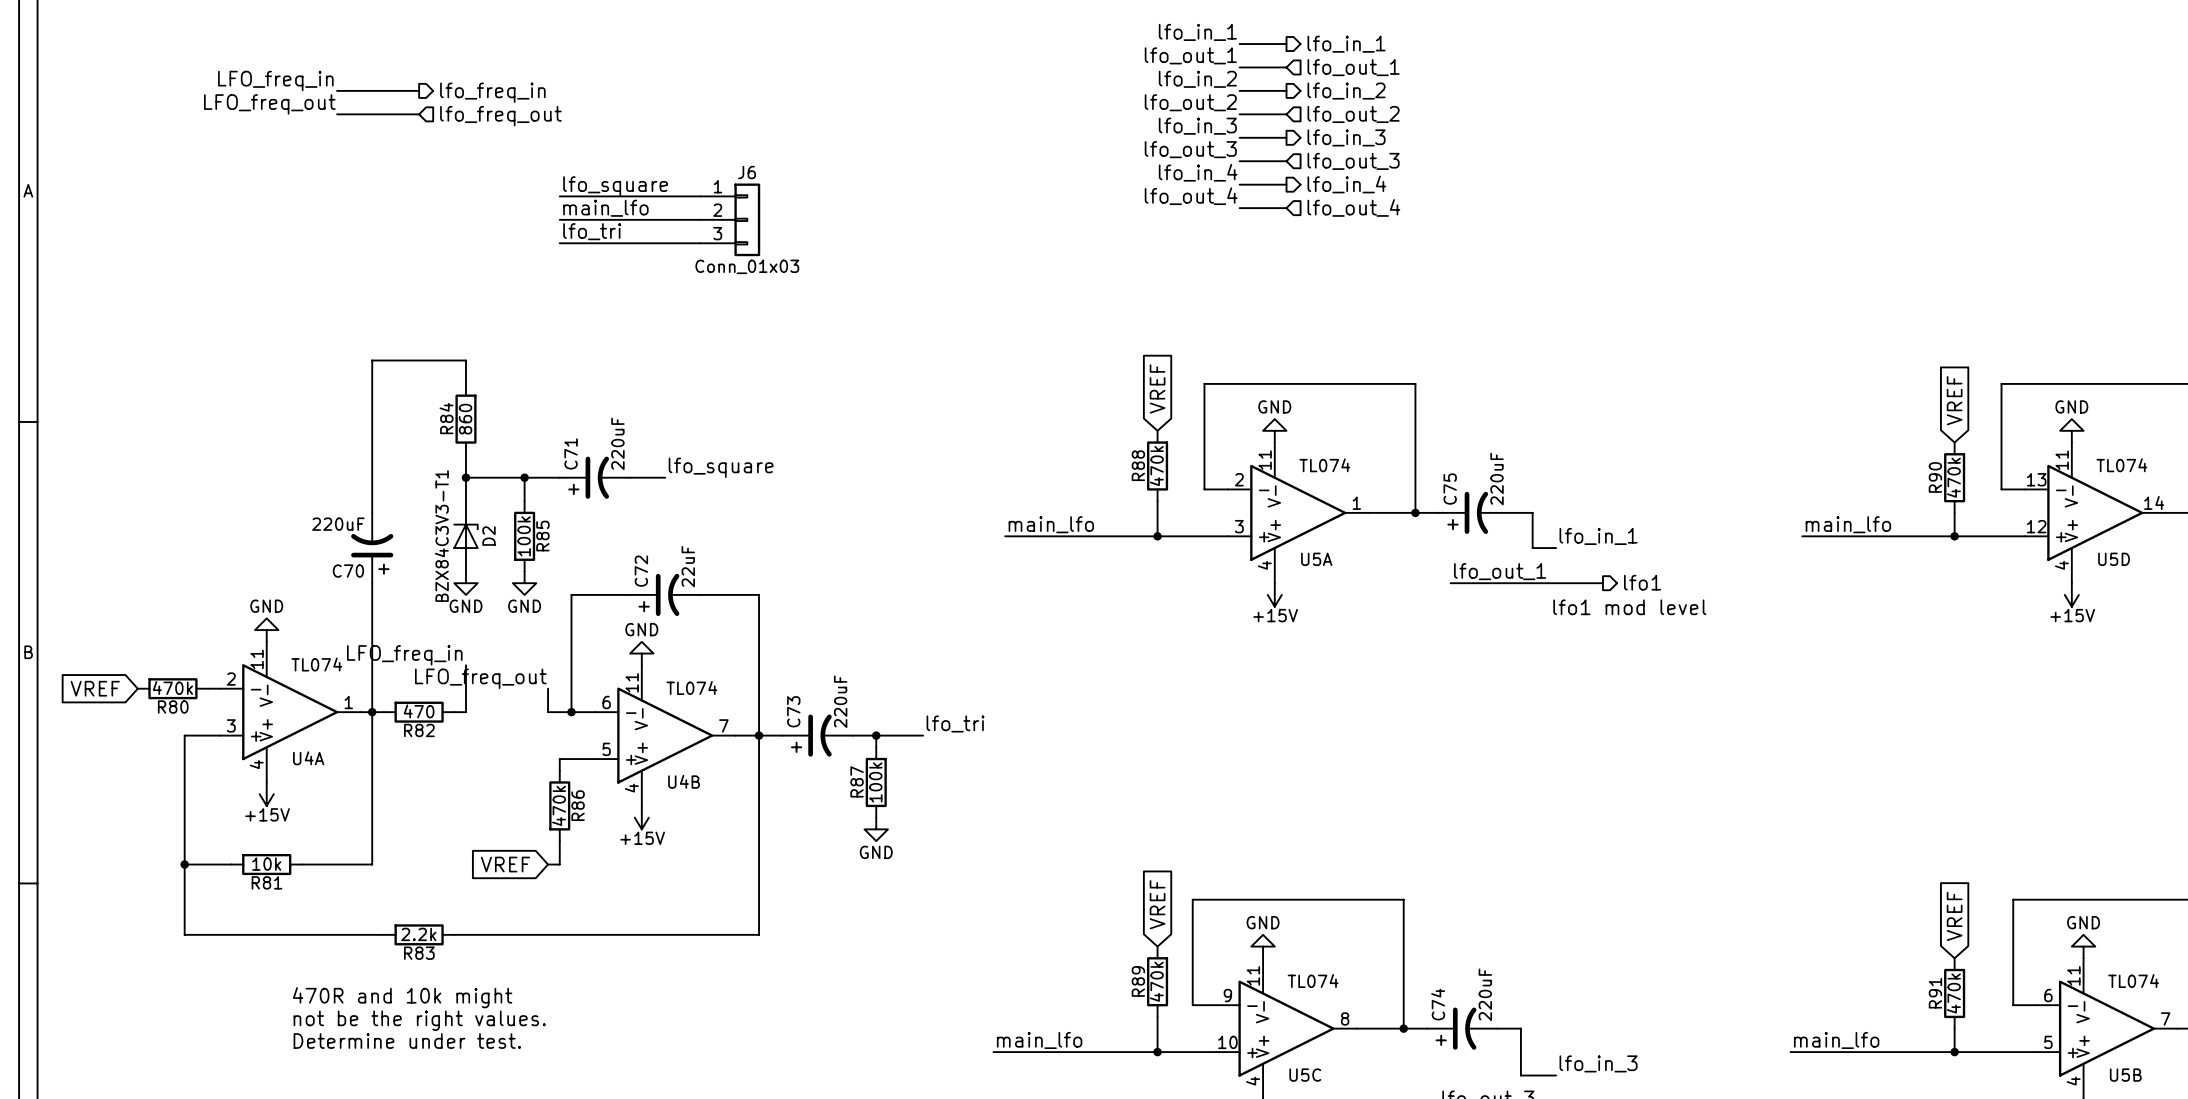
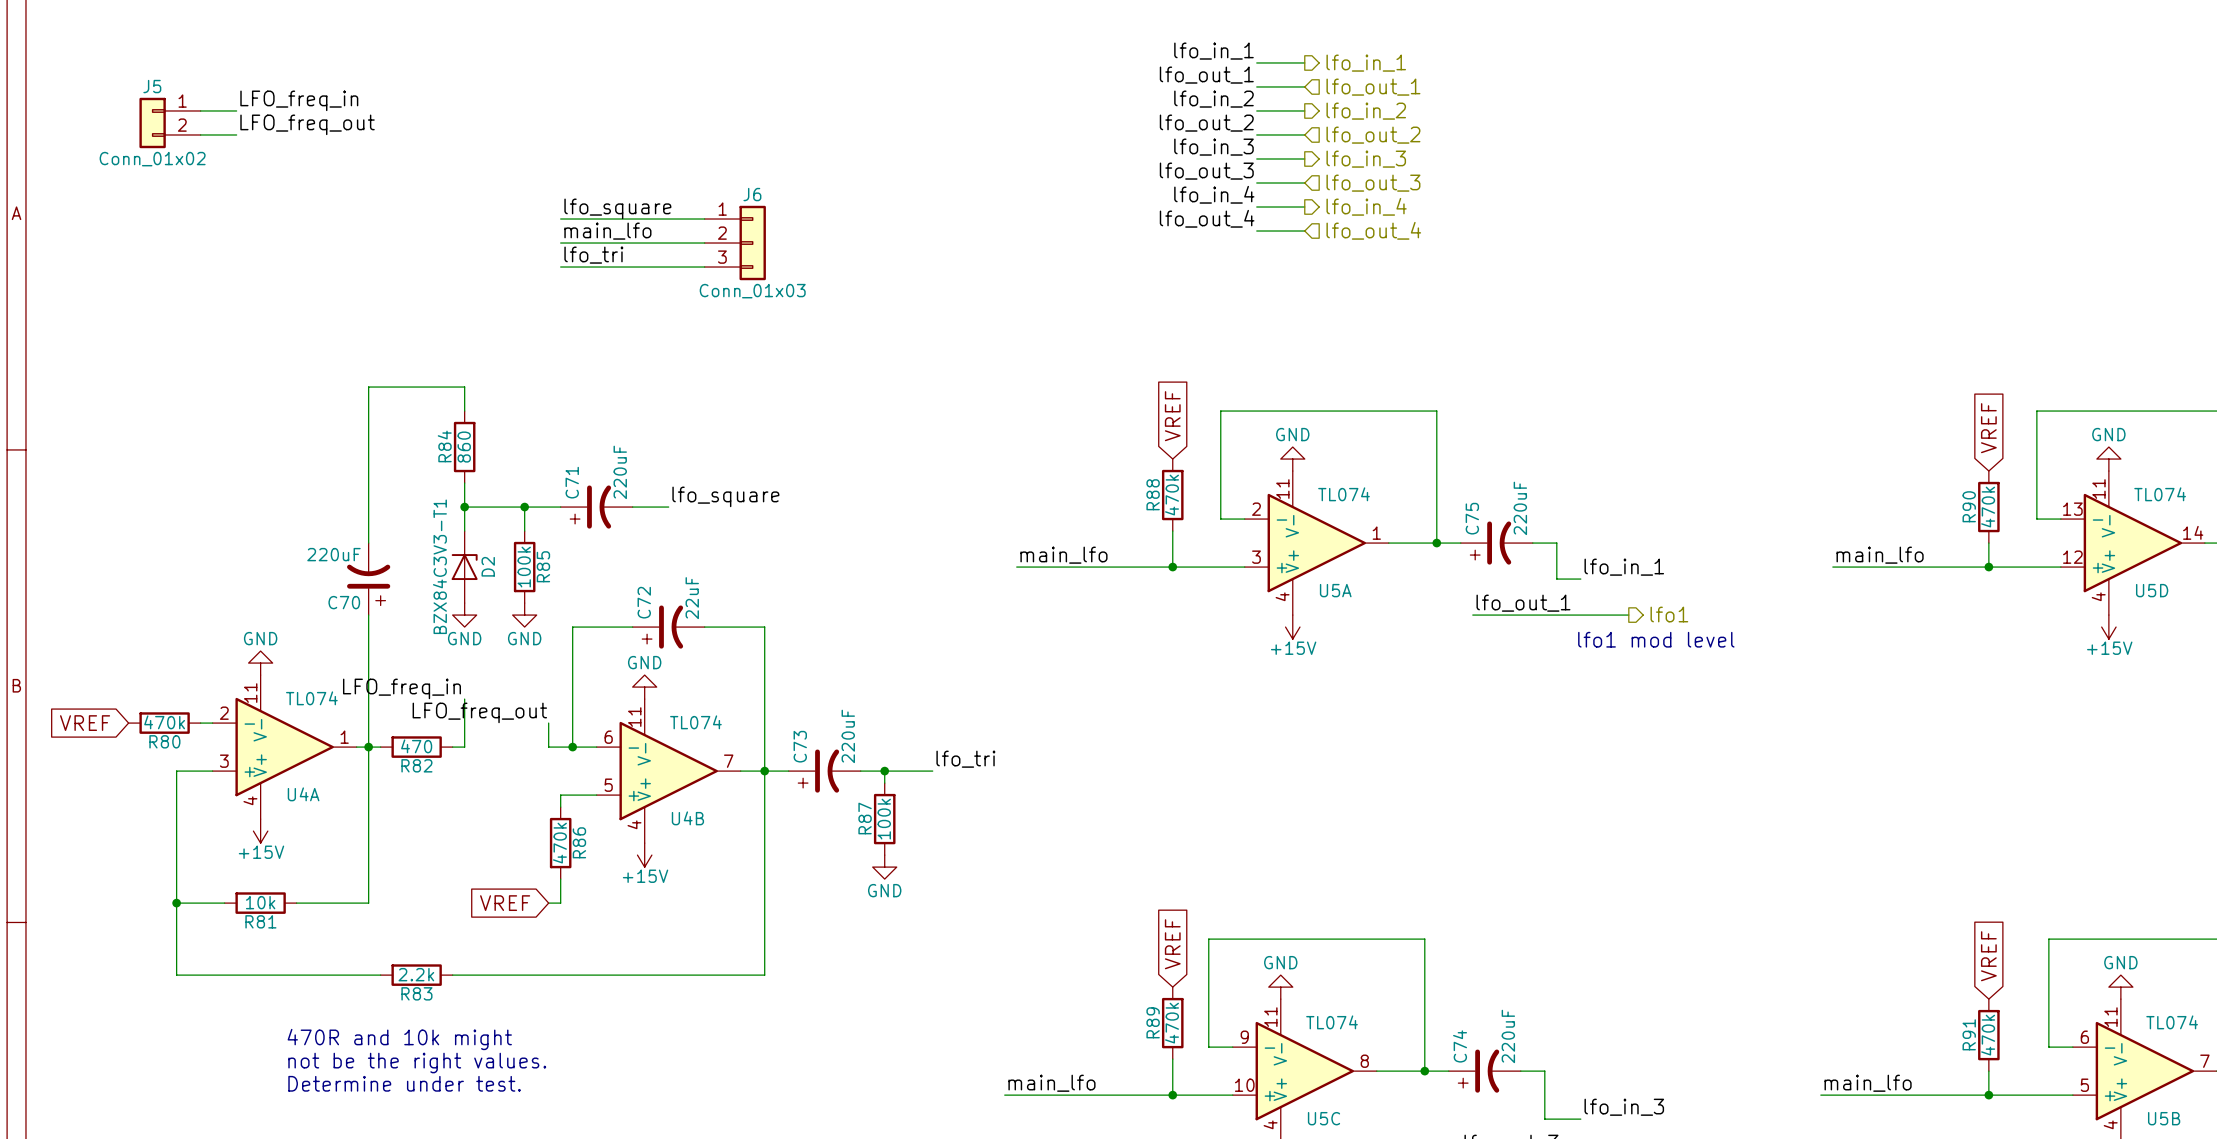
label position: LFO_freq_in (275, 80) -> LFO_freq_in (299, 100)
wire: none -> (200, 110) (236, 110)
wire: (337, 90) (419, 90) -> none
hierarchical label: lfo_freq_in (492, 92) -> none
J5: none -> Conn_01x02 (170, 122)
label position: LFO_freq_out (269, 104) -> LFO_freq_out (307, 124)
wire: none -> (200, 134) (236, 134)
wire: (337, 114) (419, 114) -> none
hierarchical label: lfo_freq_out (500, 116) -> none

